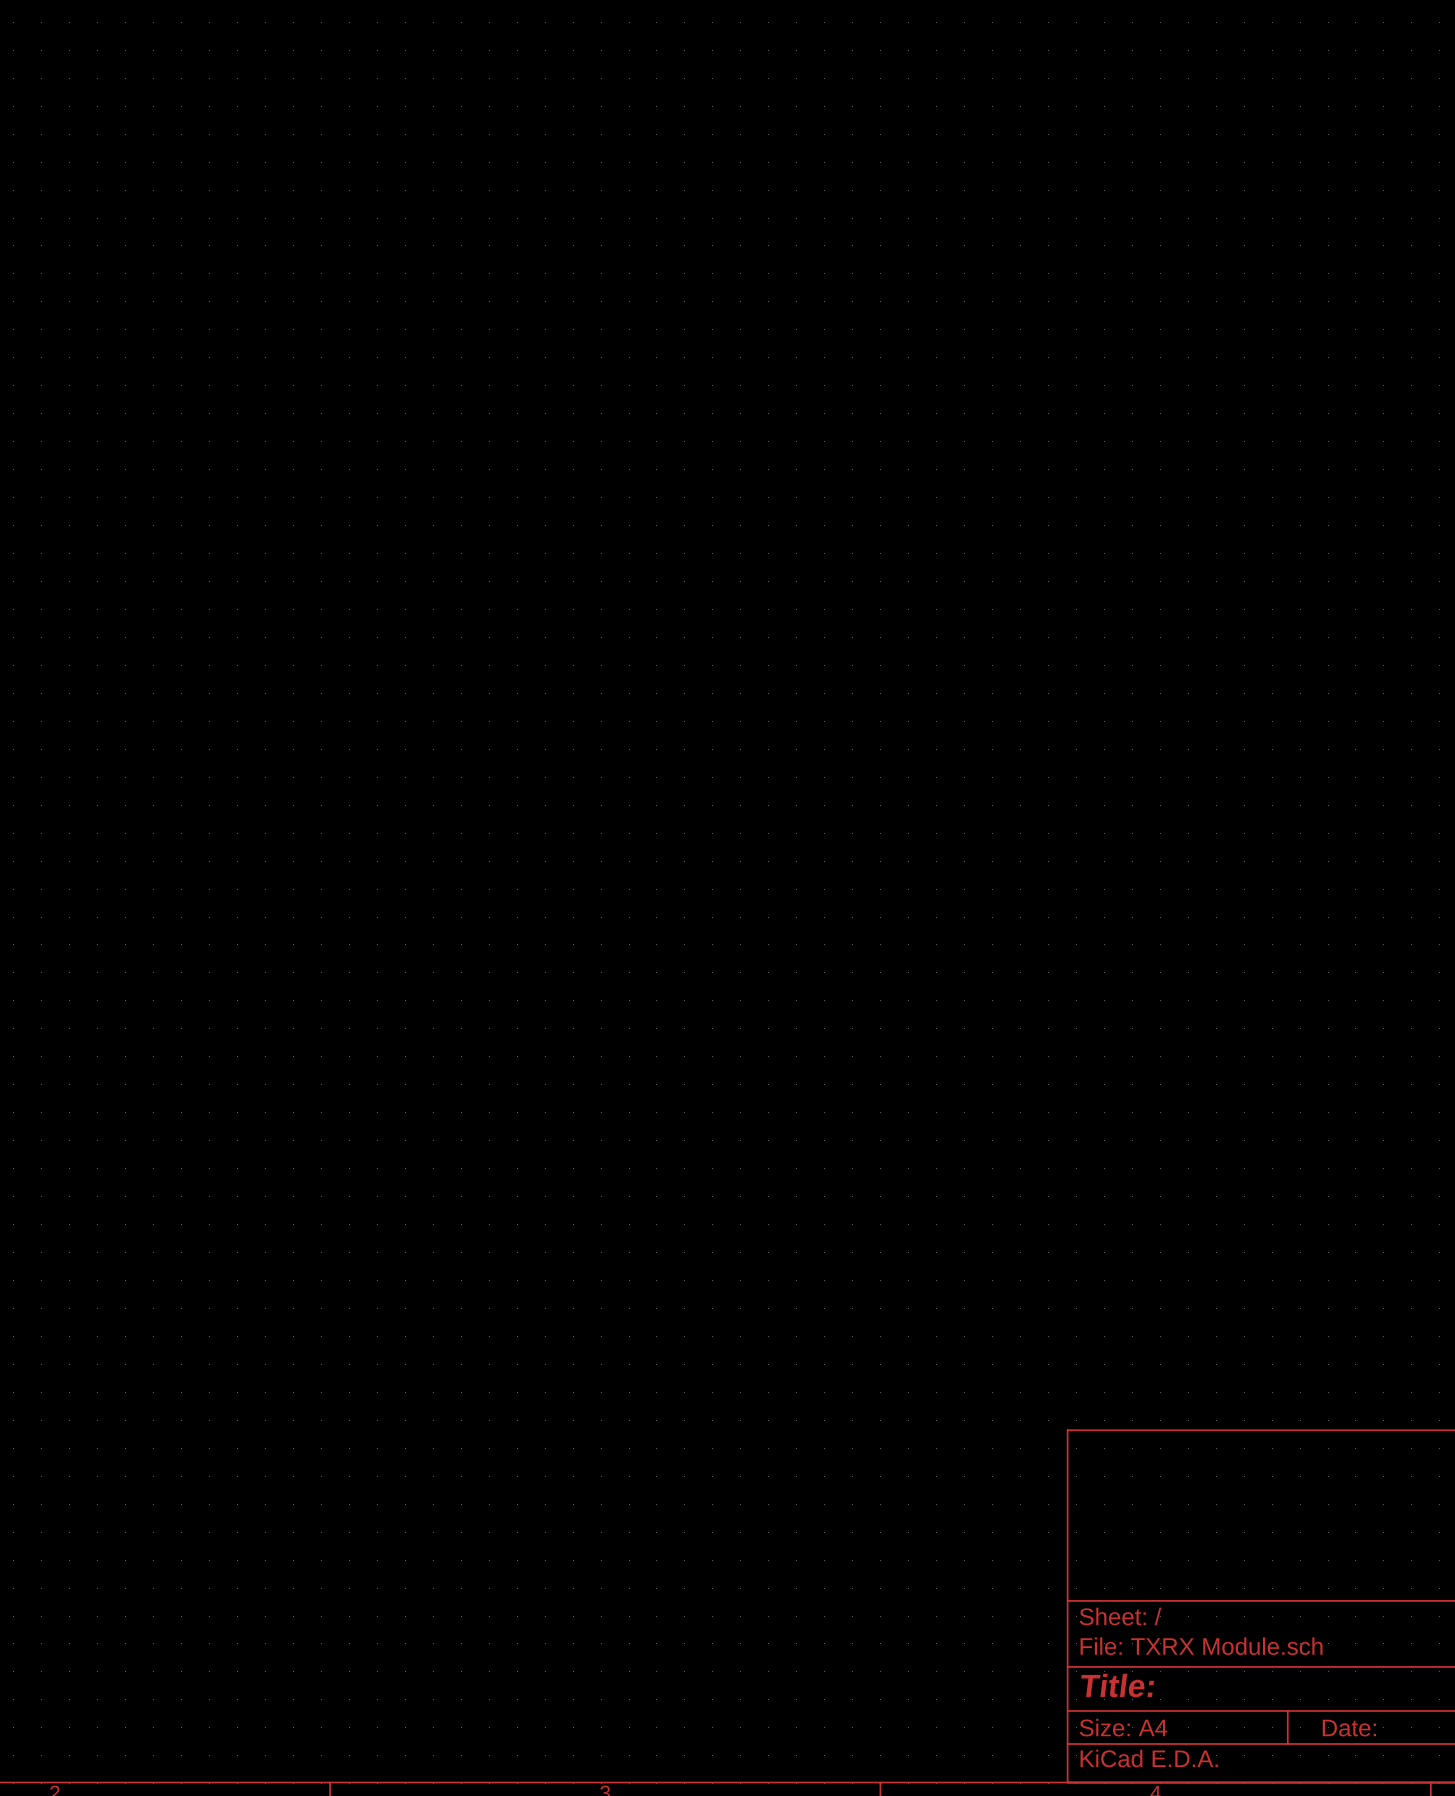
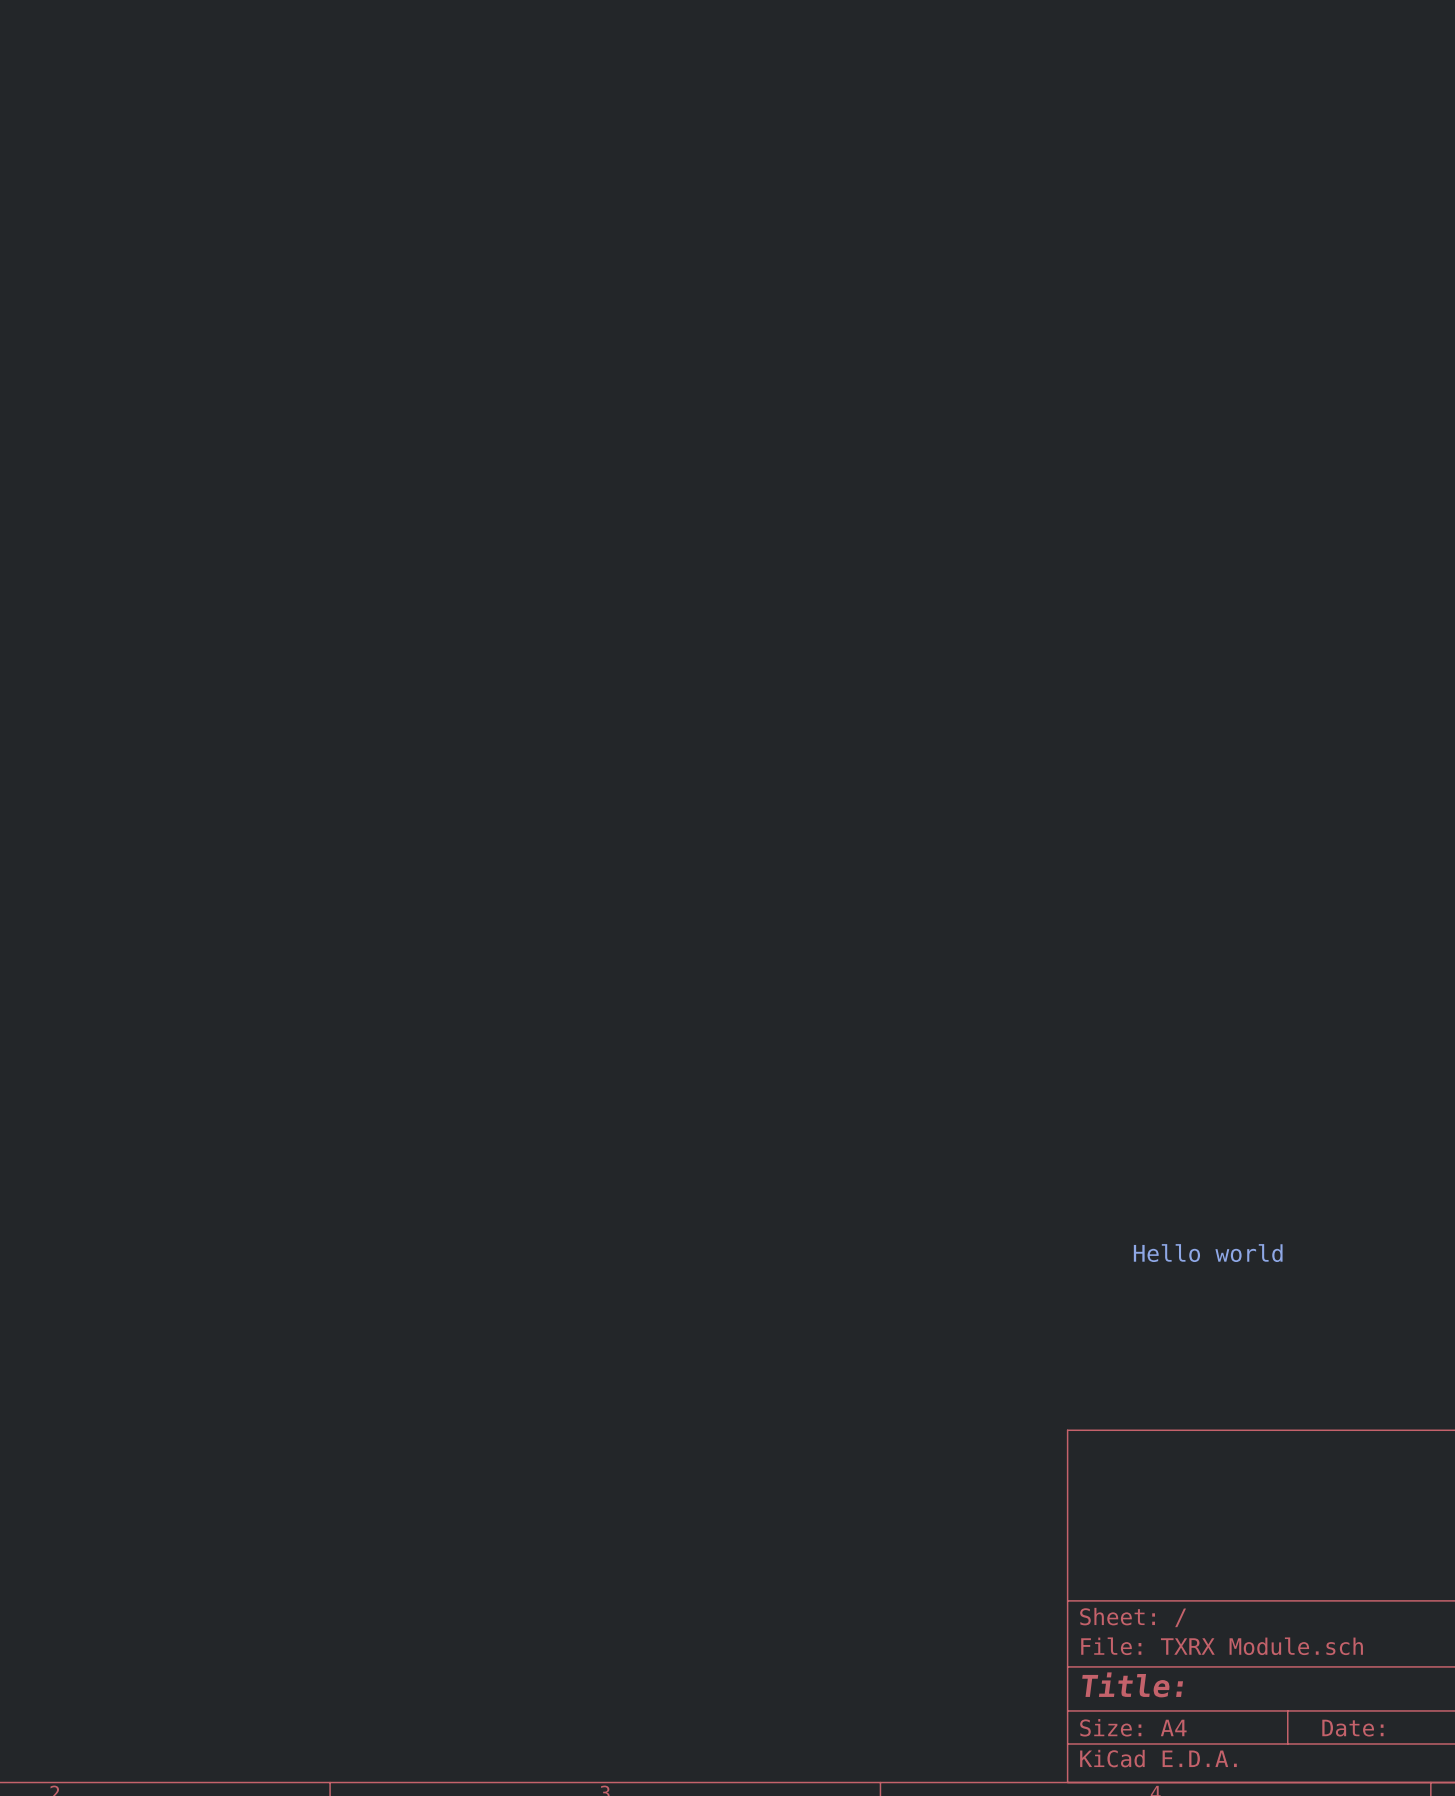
text: none -> Hello world (1208, 1253)

